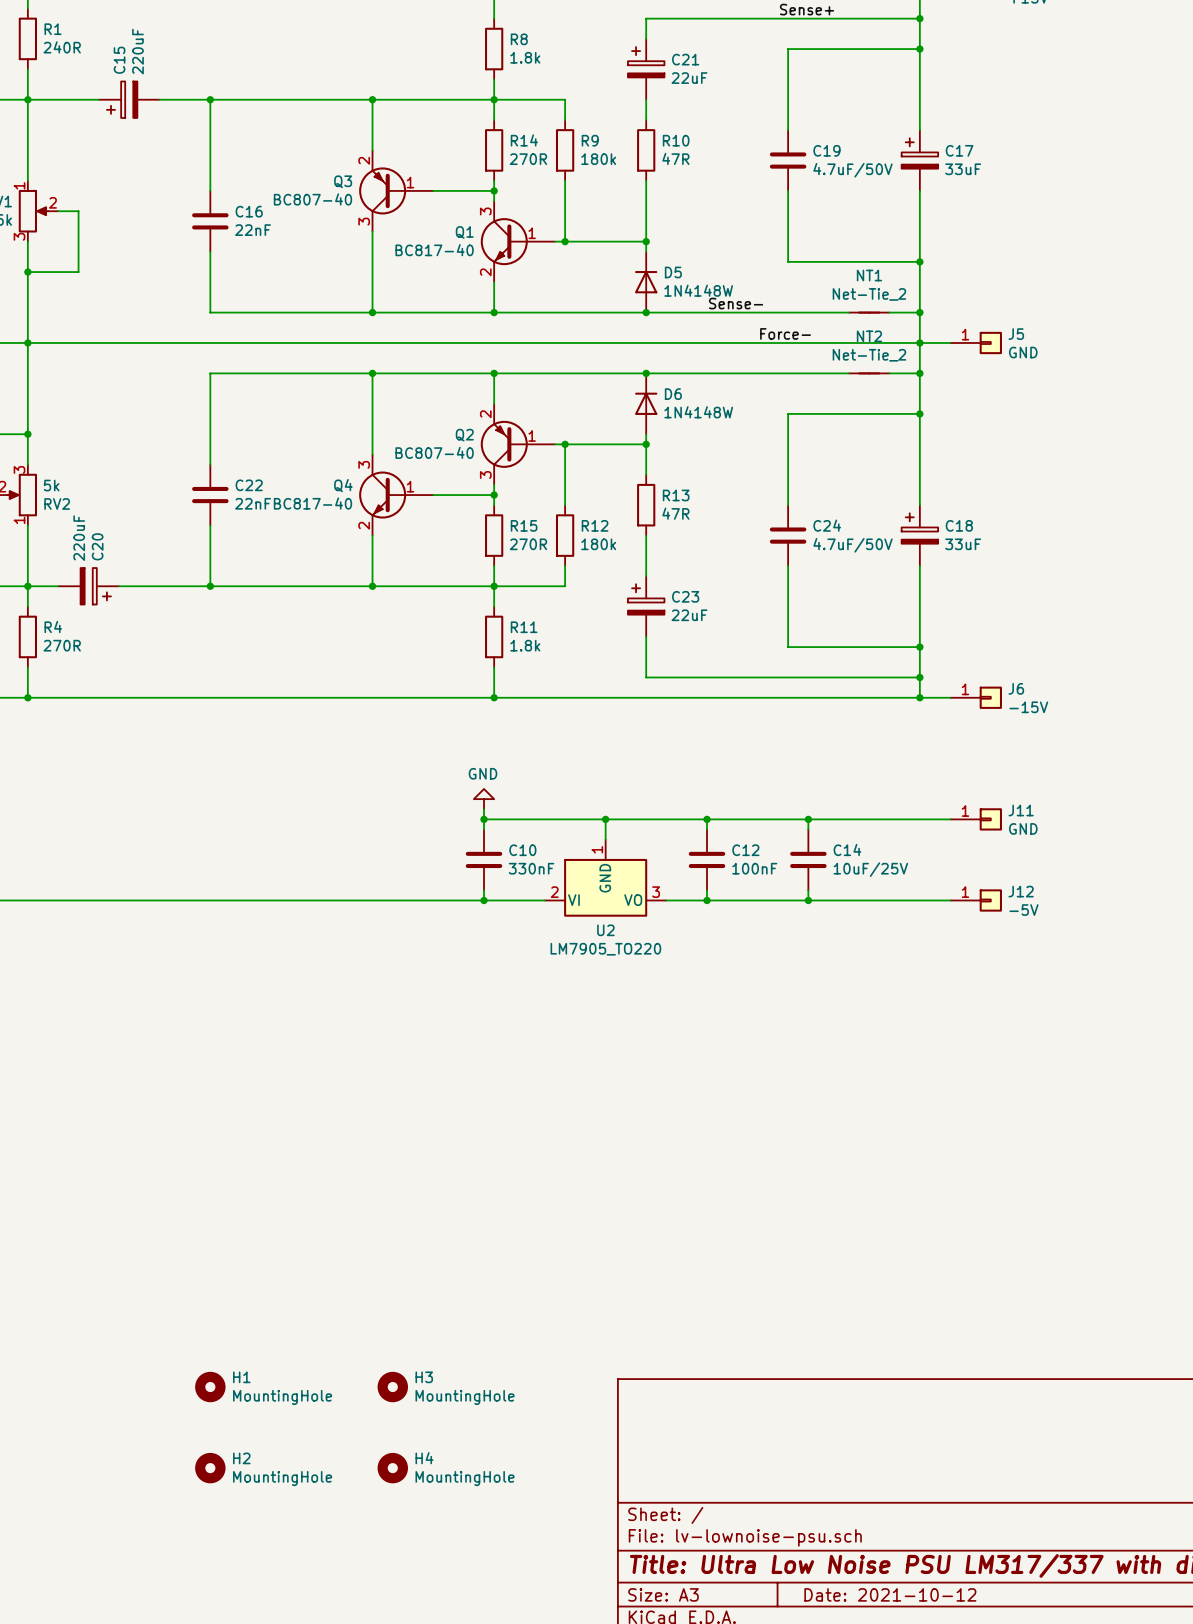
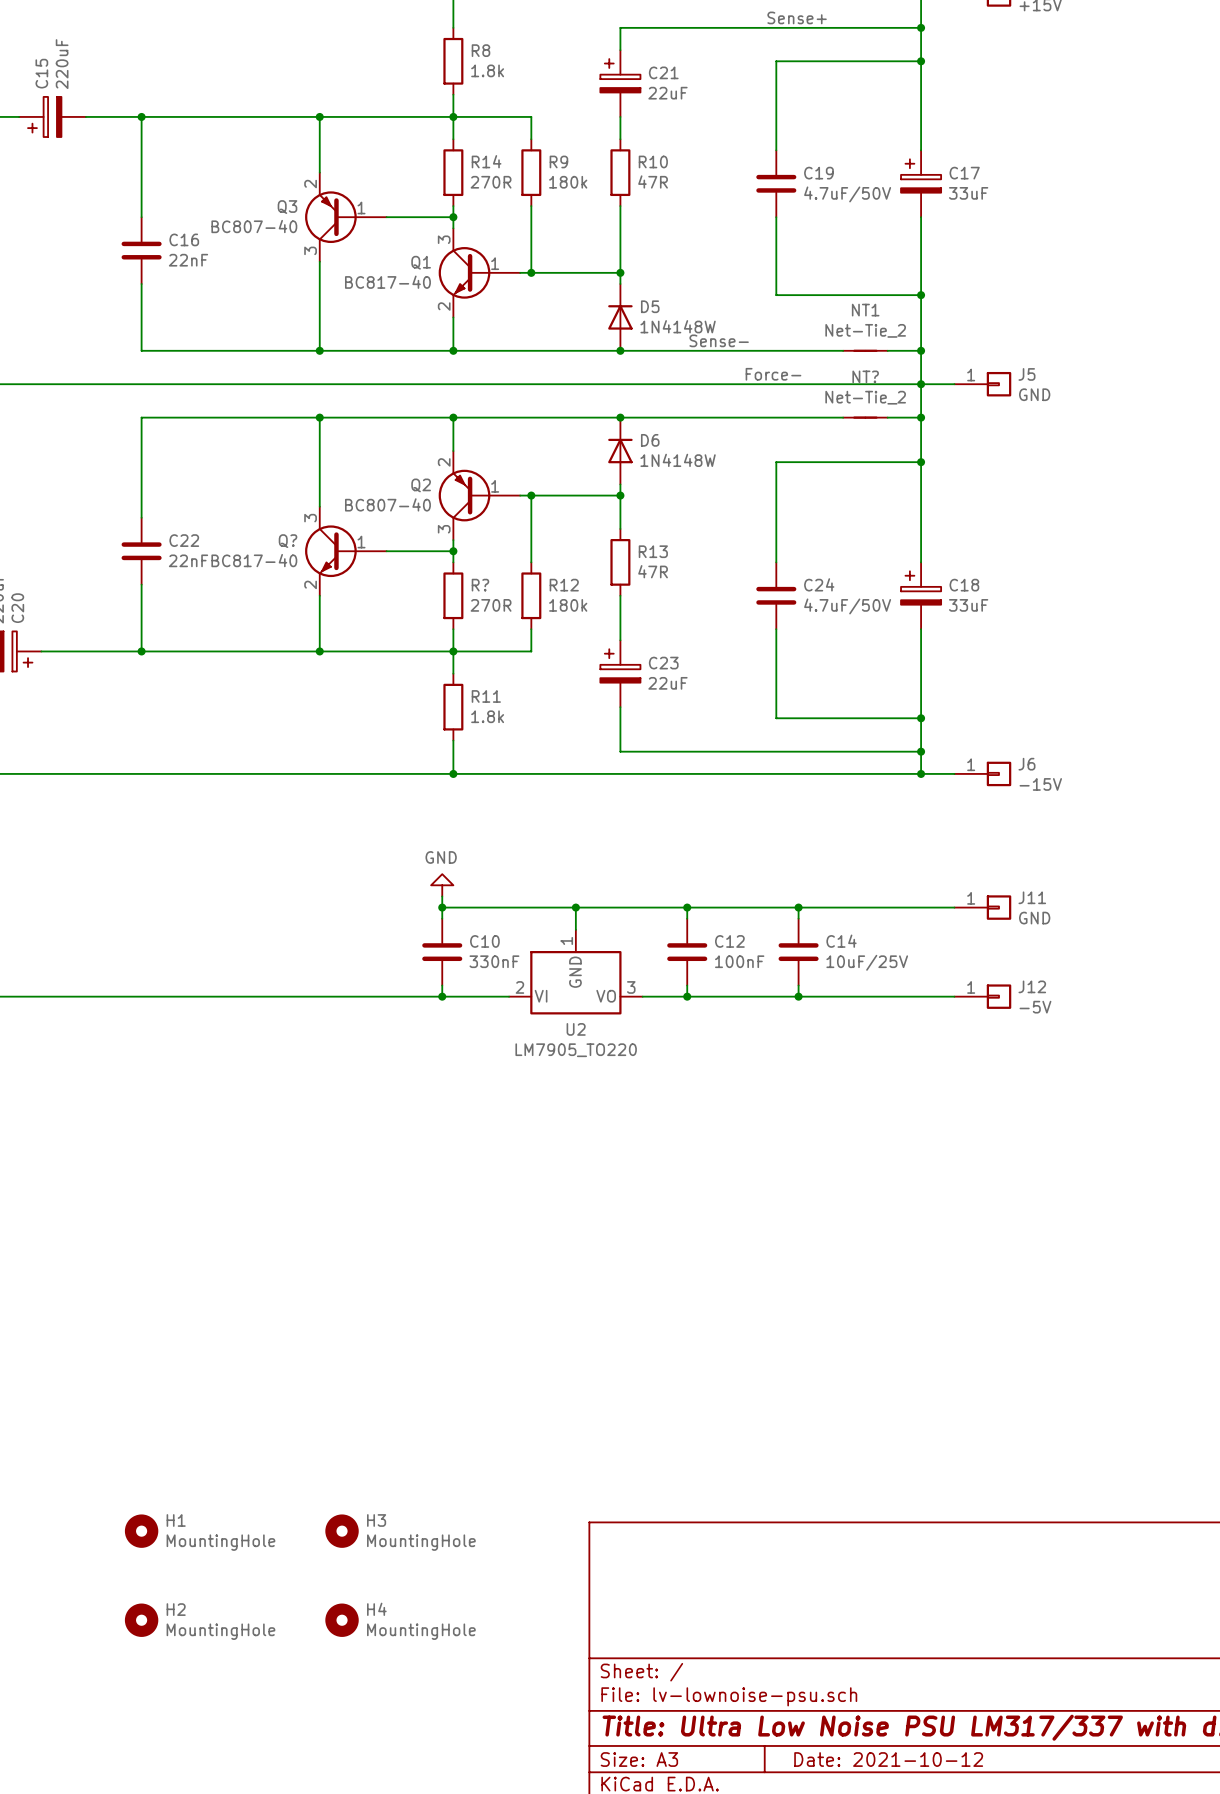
NT2 name: NT2 (869, 336) -> NT? (865, 376)
Q4 name: Q4 (343, 485) -> Q? (288, 541)
R15 name: R15 (524, 525) -> R? (480, 585)

